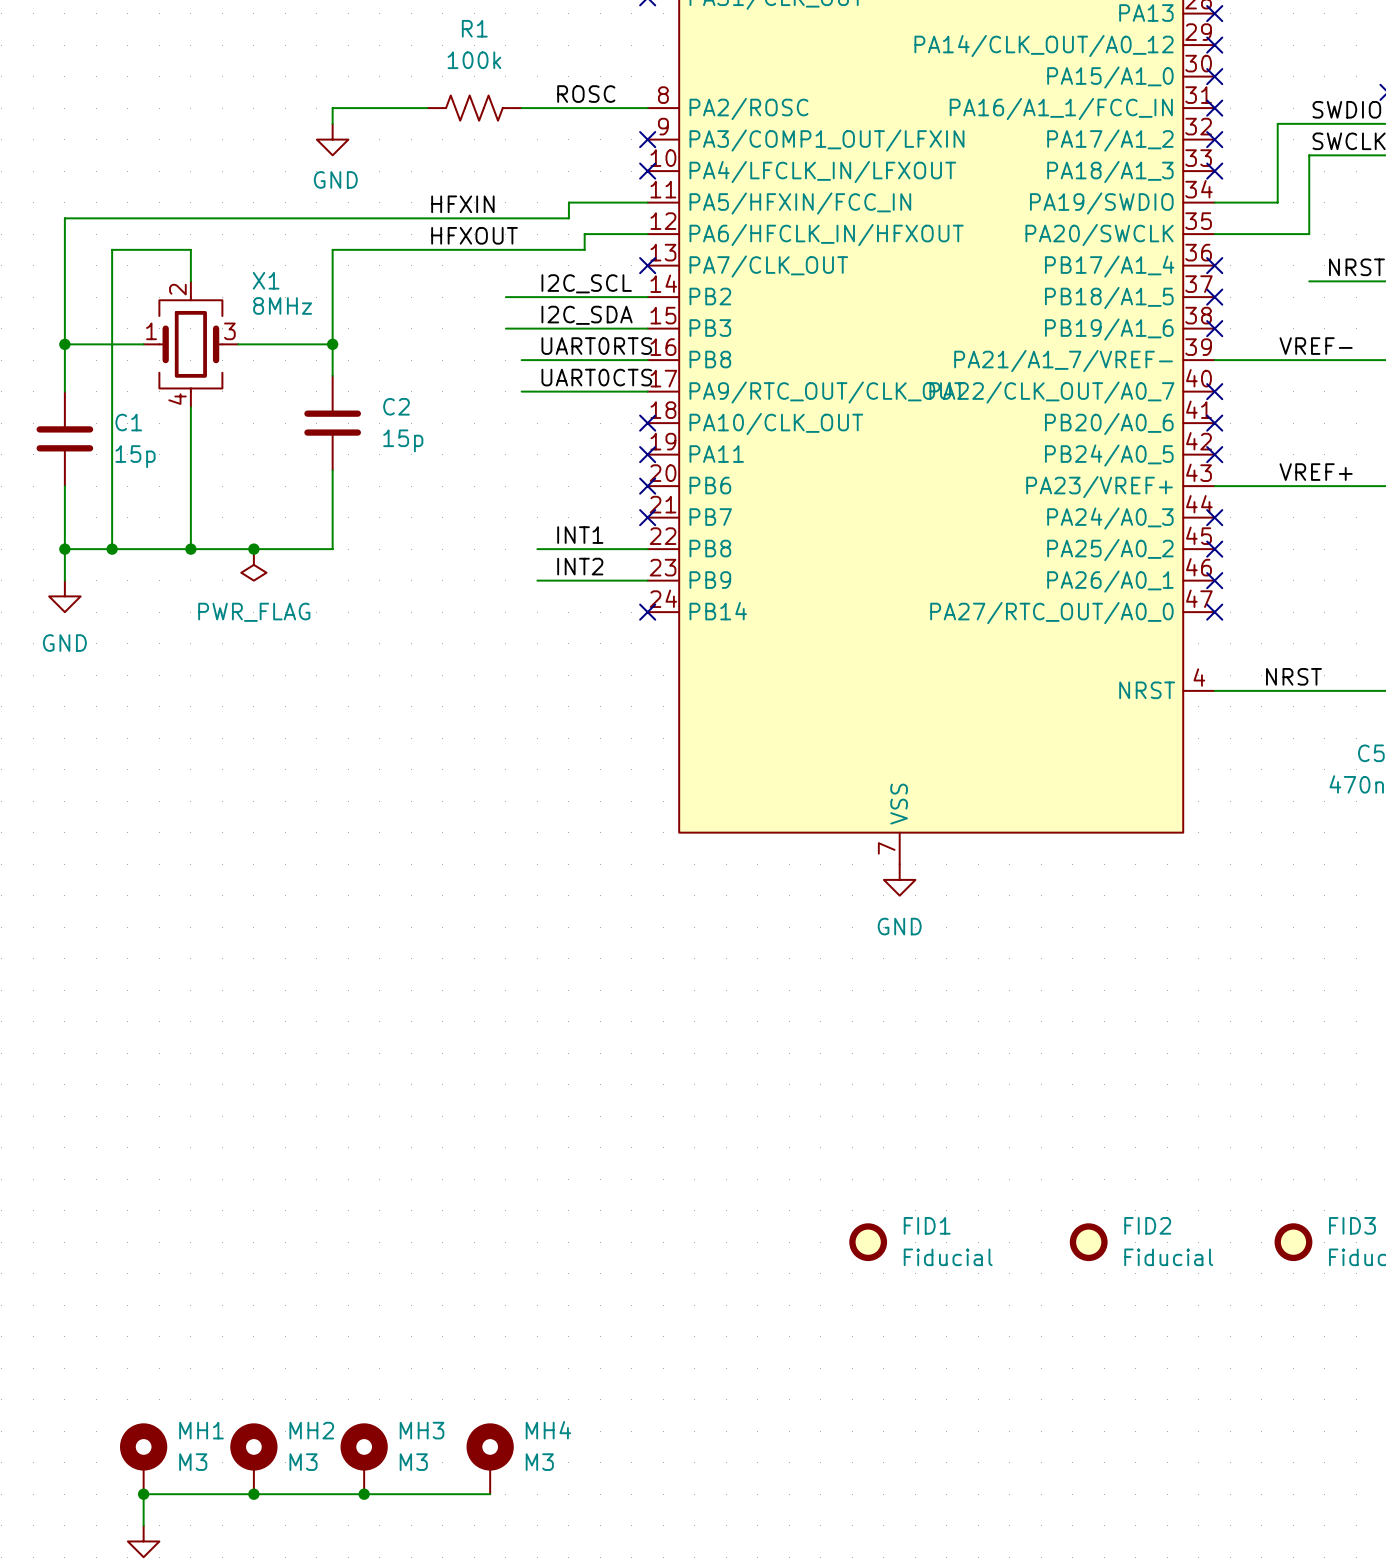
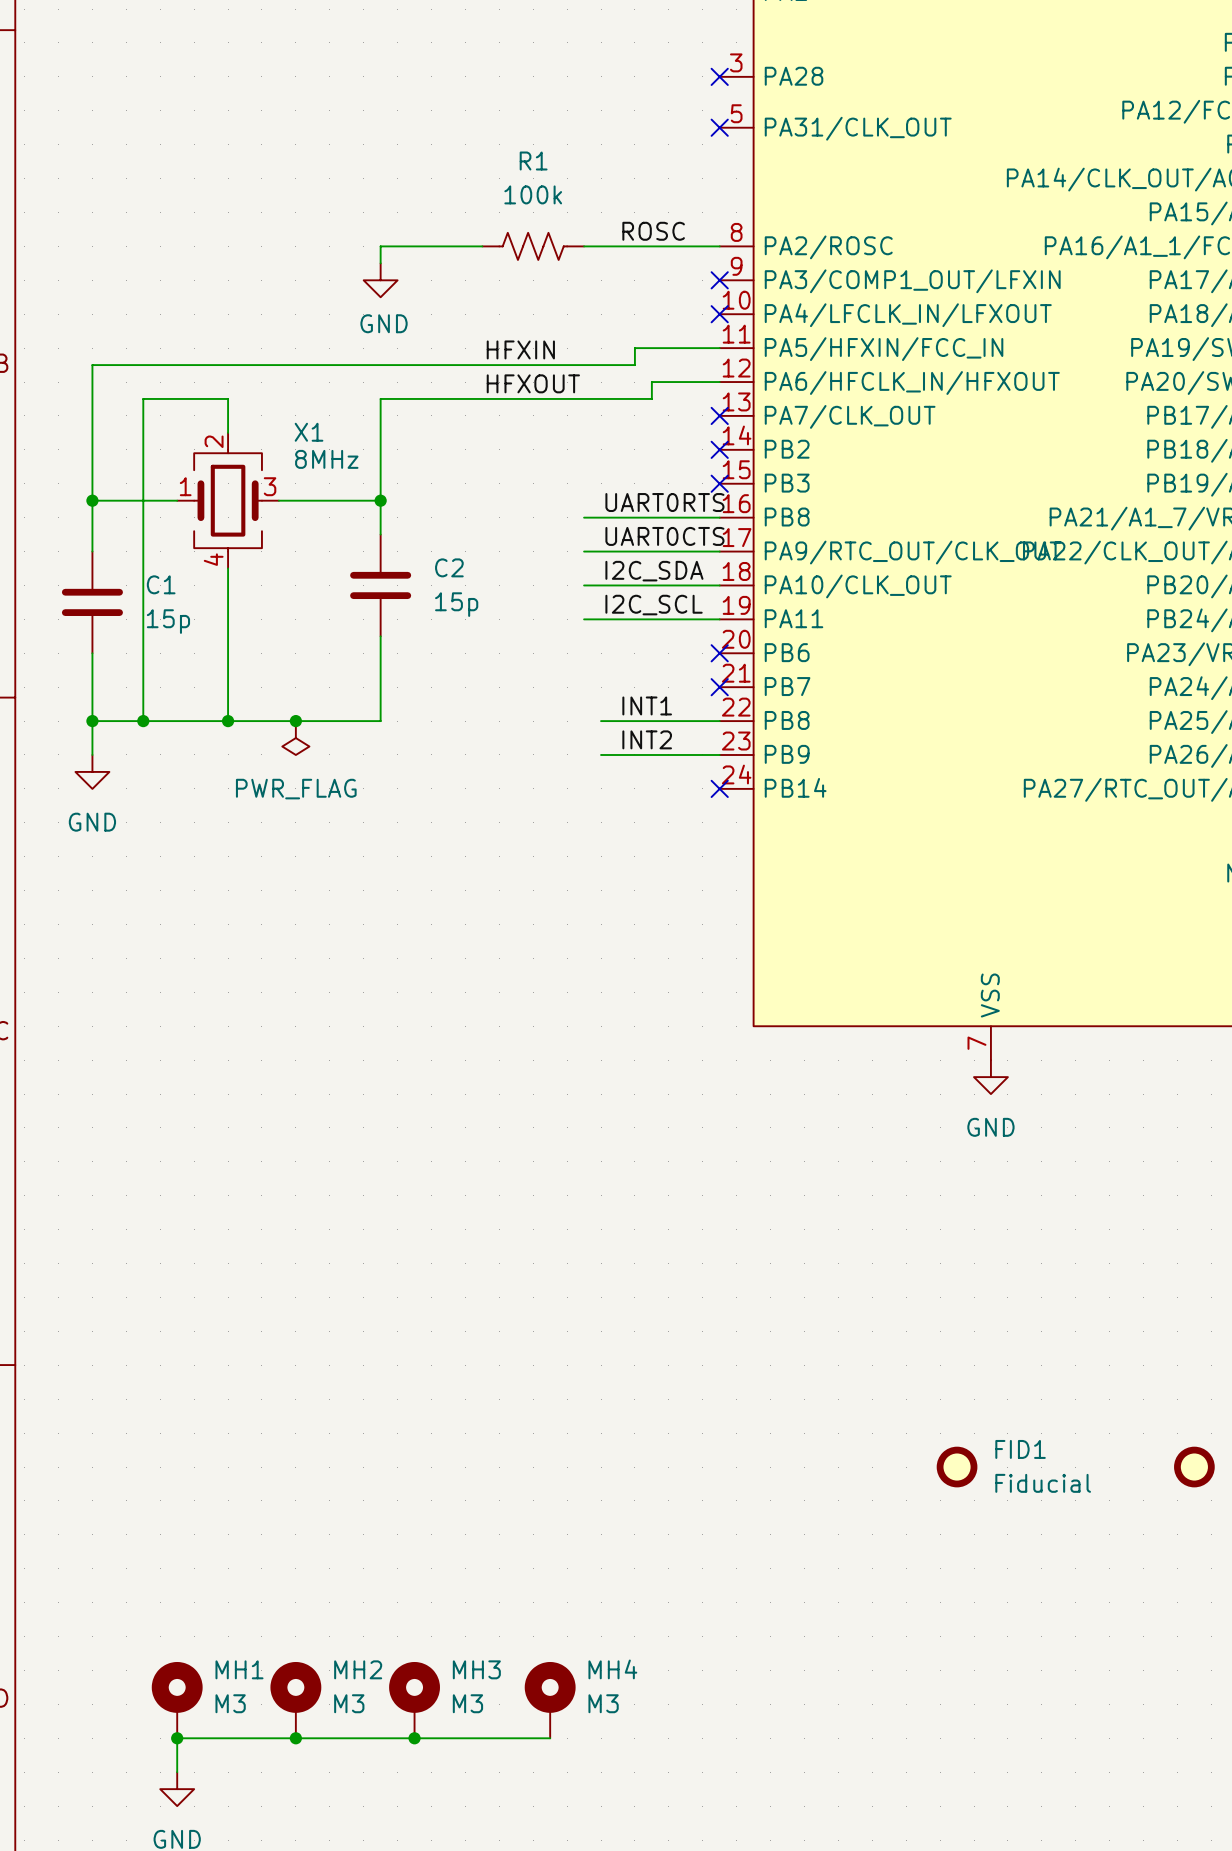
label position: I2C_SCL (586, 283) -> I2C_SCL (654, 605)
wire: (505, 297) (647, 297) -> none
no-connect mark: none -> (719, 449)
label position: I2C_SDA (587, 315) -> I2C_SDA (654, 571)
wire: (505, 328) (647, 328) -> none
no-connect mark: none -> (719, 483)
wire: none -> (584, 585) (719, 585)
no-connect mark: (647, 423) -> none
wire: none -> (584, 619) (719, 619)
no-connect mark: (647, 454) -> none

